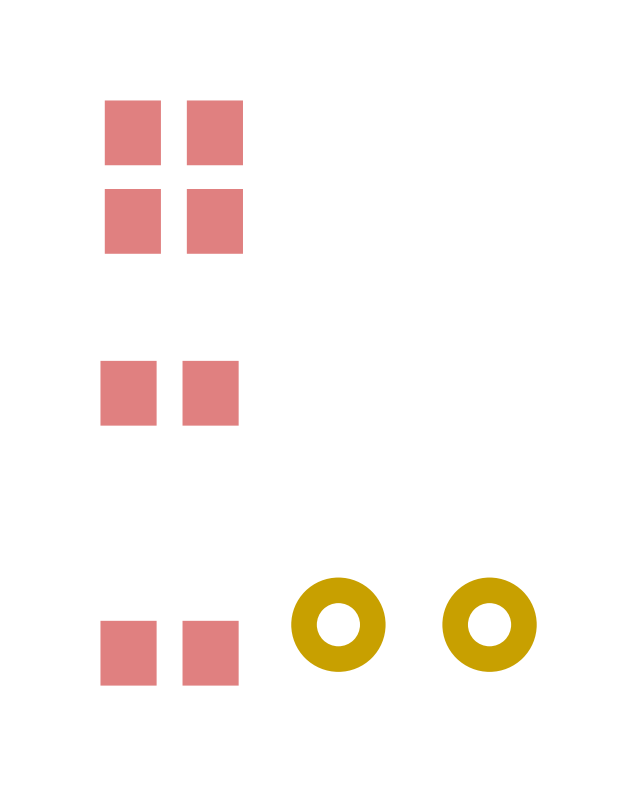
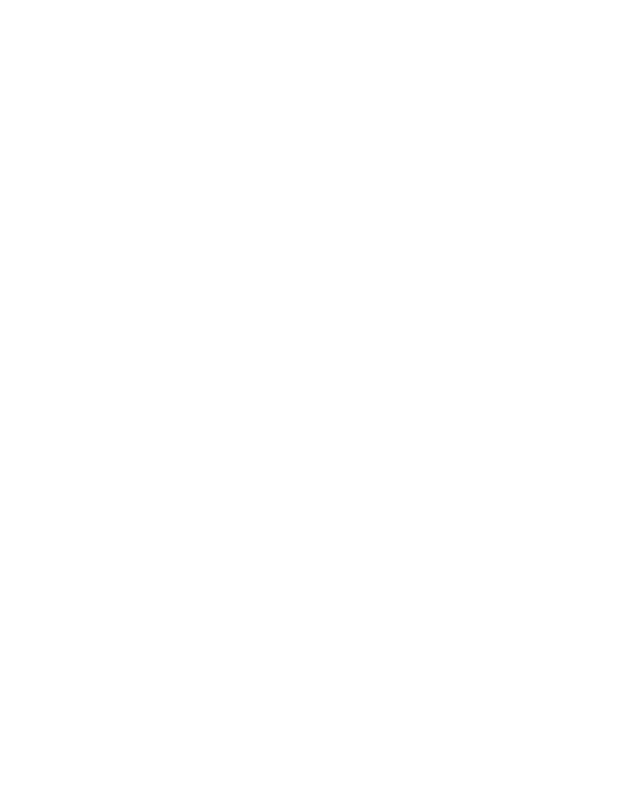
part: (173, 132) -> none
part: (173, 221) -> none
part: (169, 393) -> none
part: (413, 624) -> none
part: (169, 653) -> none

